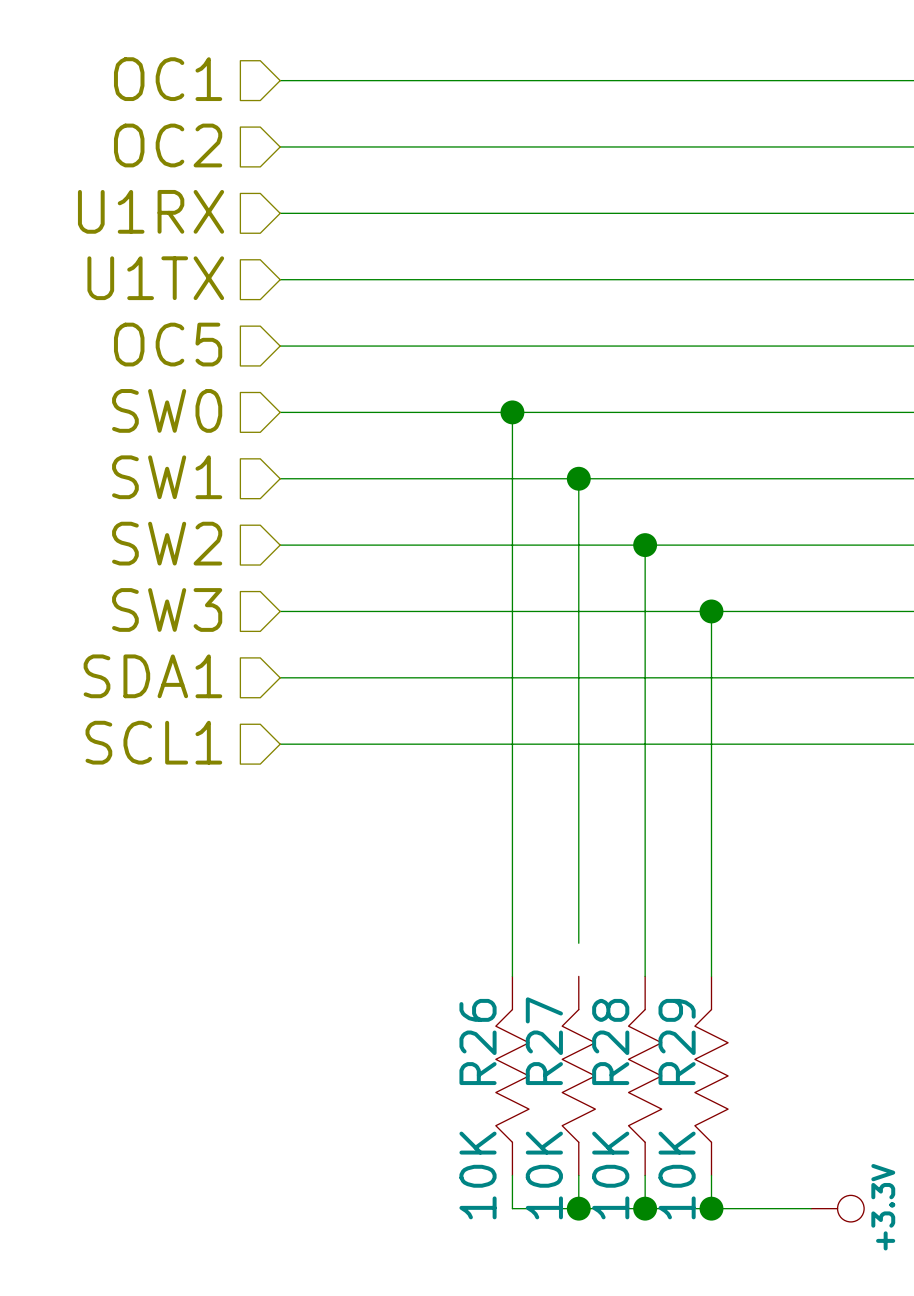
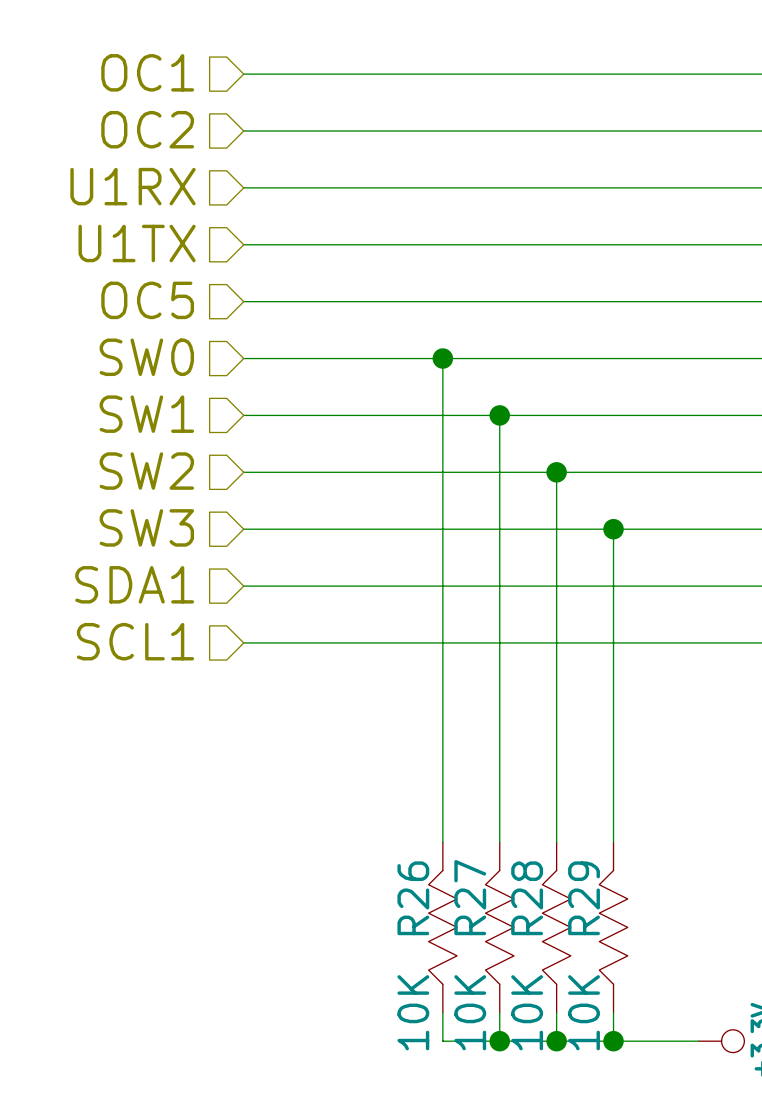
wire: none -> (499, 813) (499, 842)

